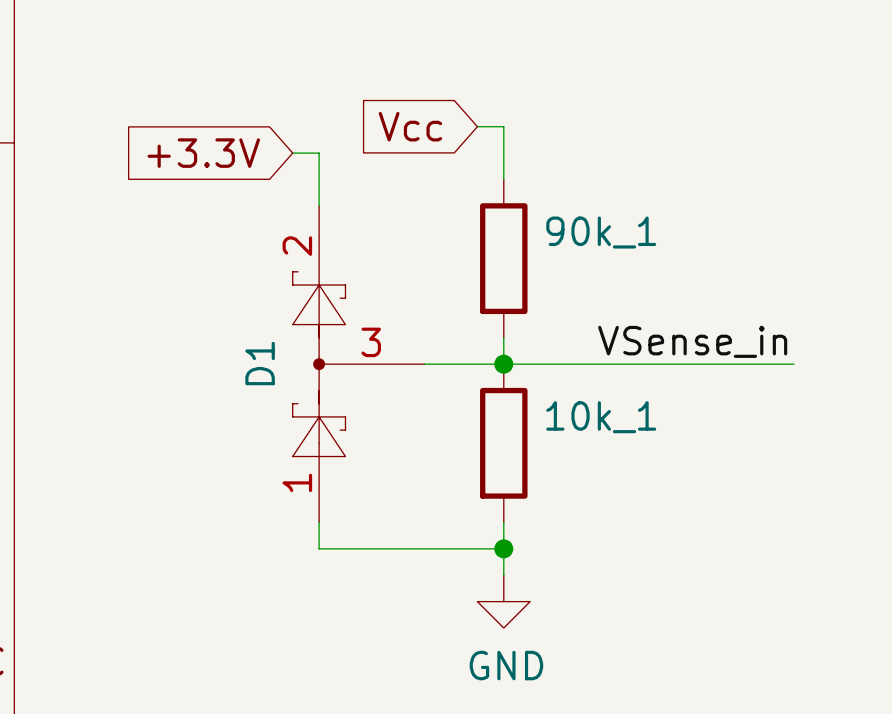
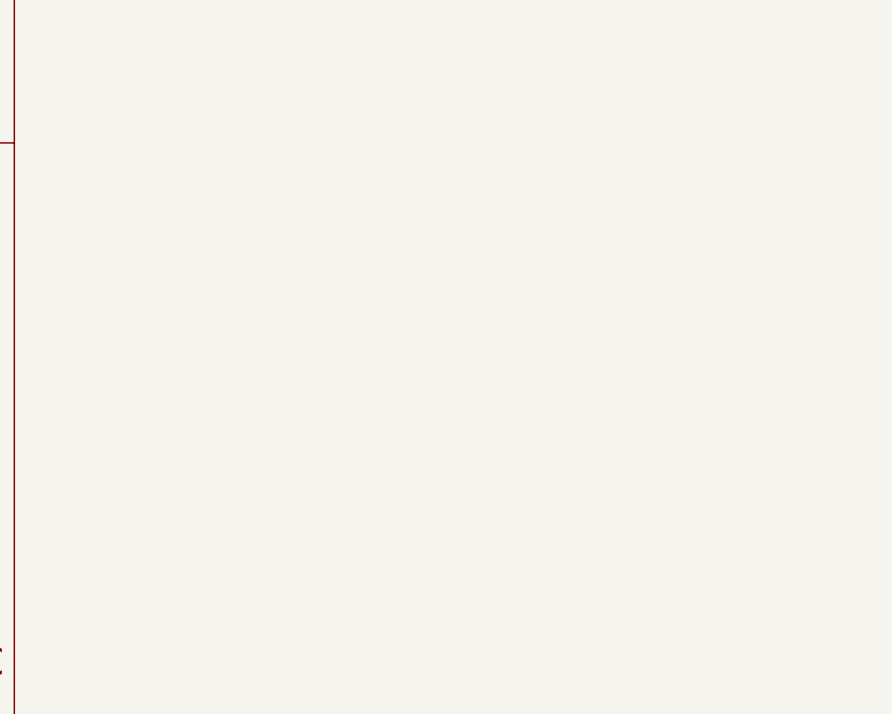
global label: Vcc (410, 126) -> none
wire: (477, 126) (503, 126) (503, 179) -> none
global label: +3.3V (203, 153) -> none
wire: (292, 153) (319, 153) (319, 205) -> none
90k_1: (503, 258) -> none
wire: (503, 337) (503, 364) -> none
label: VSense_in (692, 341) -> none
D1: (358, 364) -> none
wire: (424, 364) (794, 364) -> none
junction: (503, 364) -> none
10k_1: (503, 443) -> none
wire: (319, 522) (319, 548) (503, 548) -> none
wire: (503, 522) (503, 575) -> none
junction: (503, 548) -> none
power symbol: GND (503, 601) -> none

